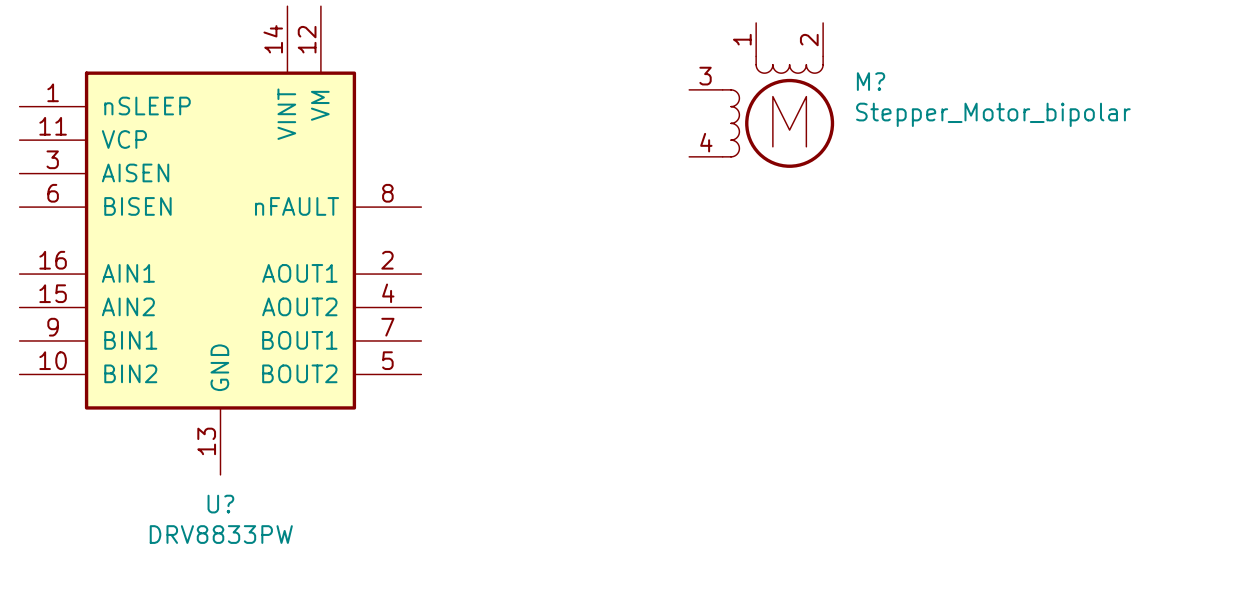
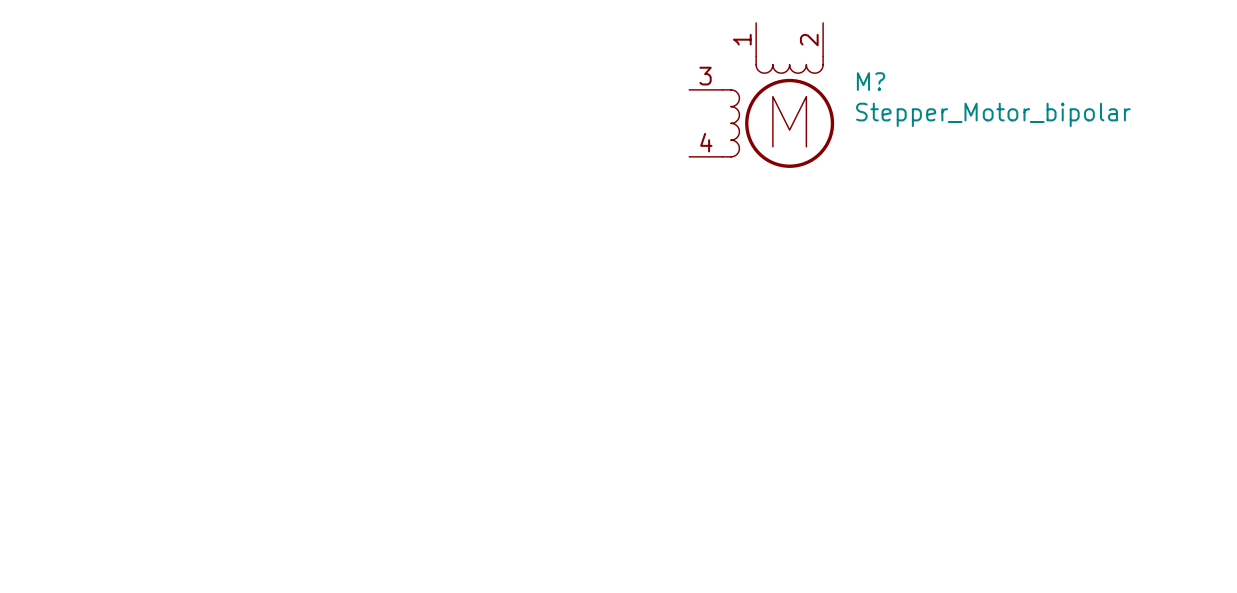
U?: DRV8833PW (220, 240) -> none

